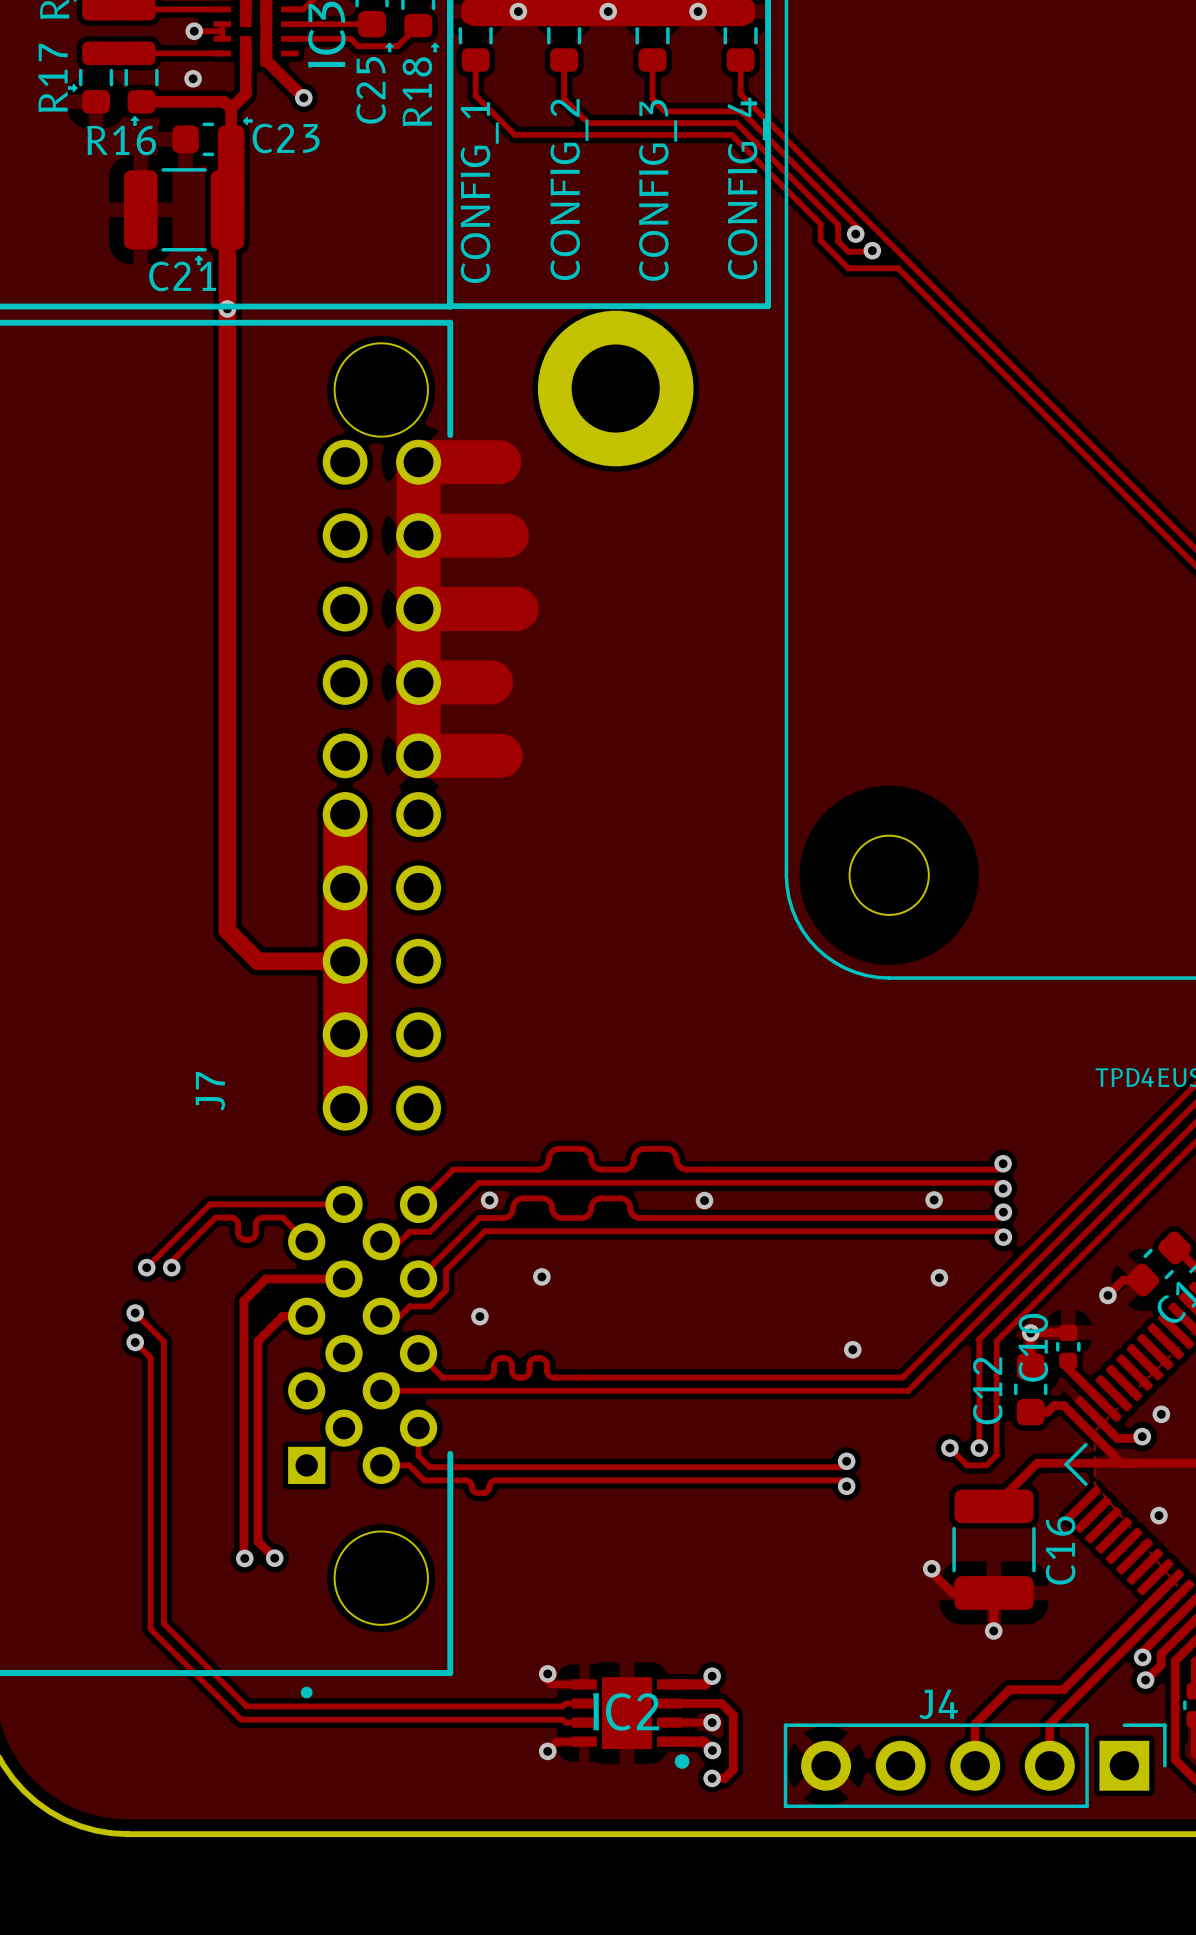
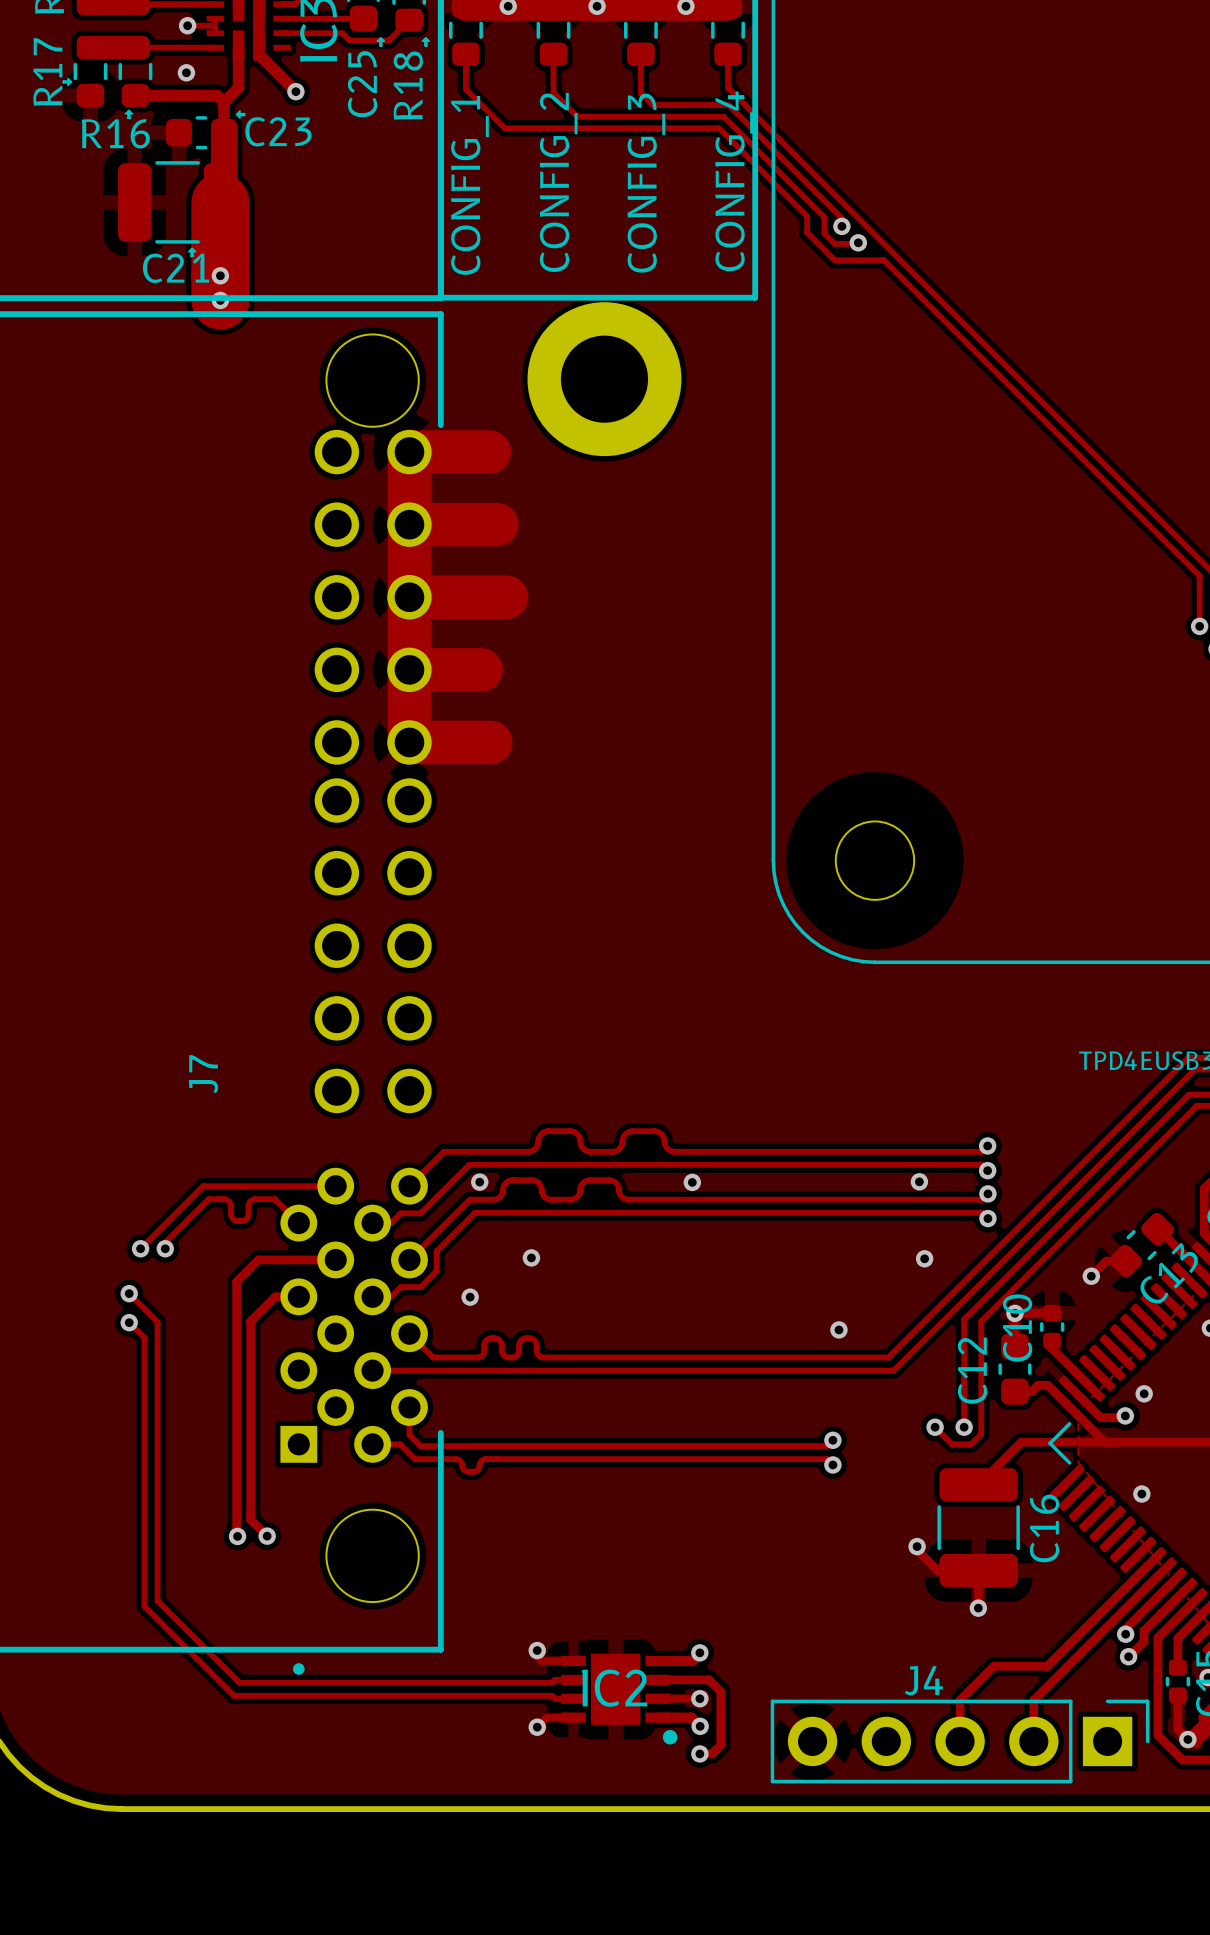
track width: thin (227, 209) (227, 308) -> thick (220, 202) (220, 300)
via: none -> (220, 275)
track: (227, 308) (227, 930) (257, 961) (345, 961) -> none
track: (345, 814) (345, 1108) -> none

